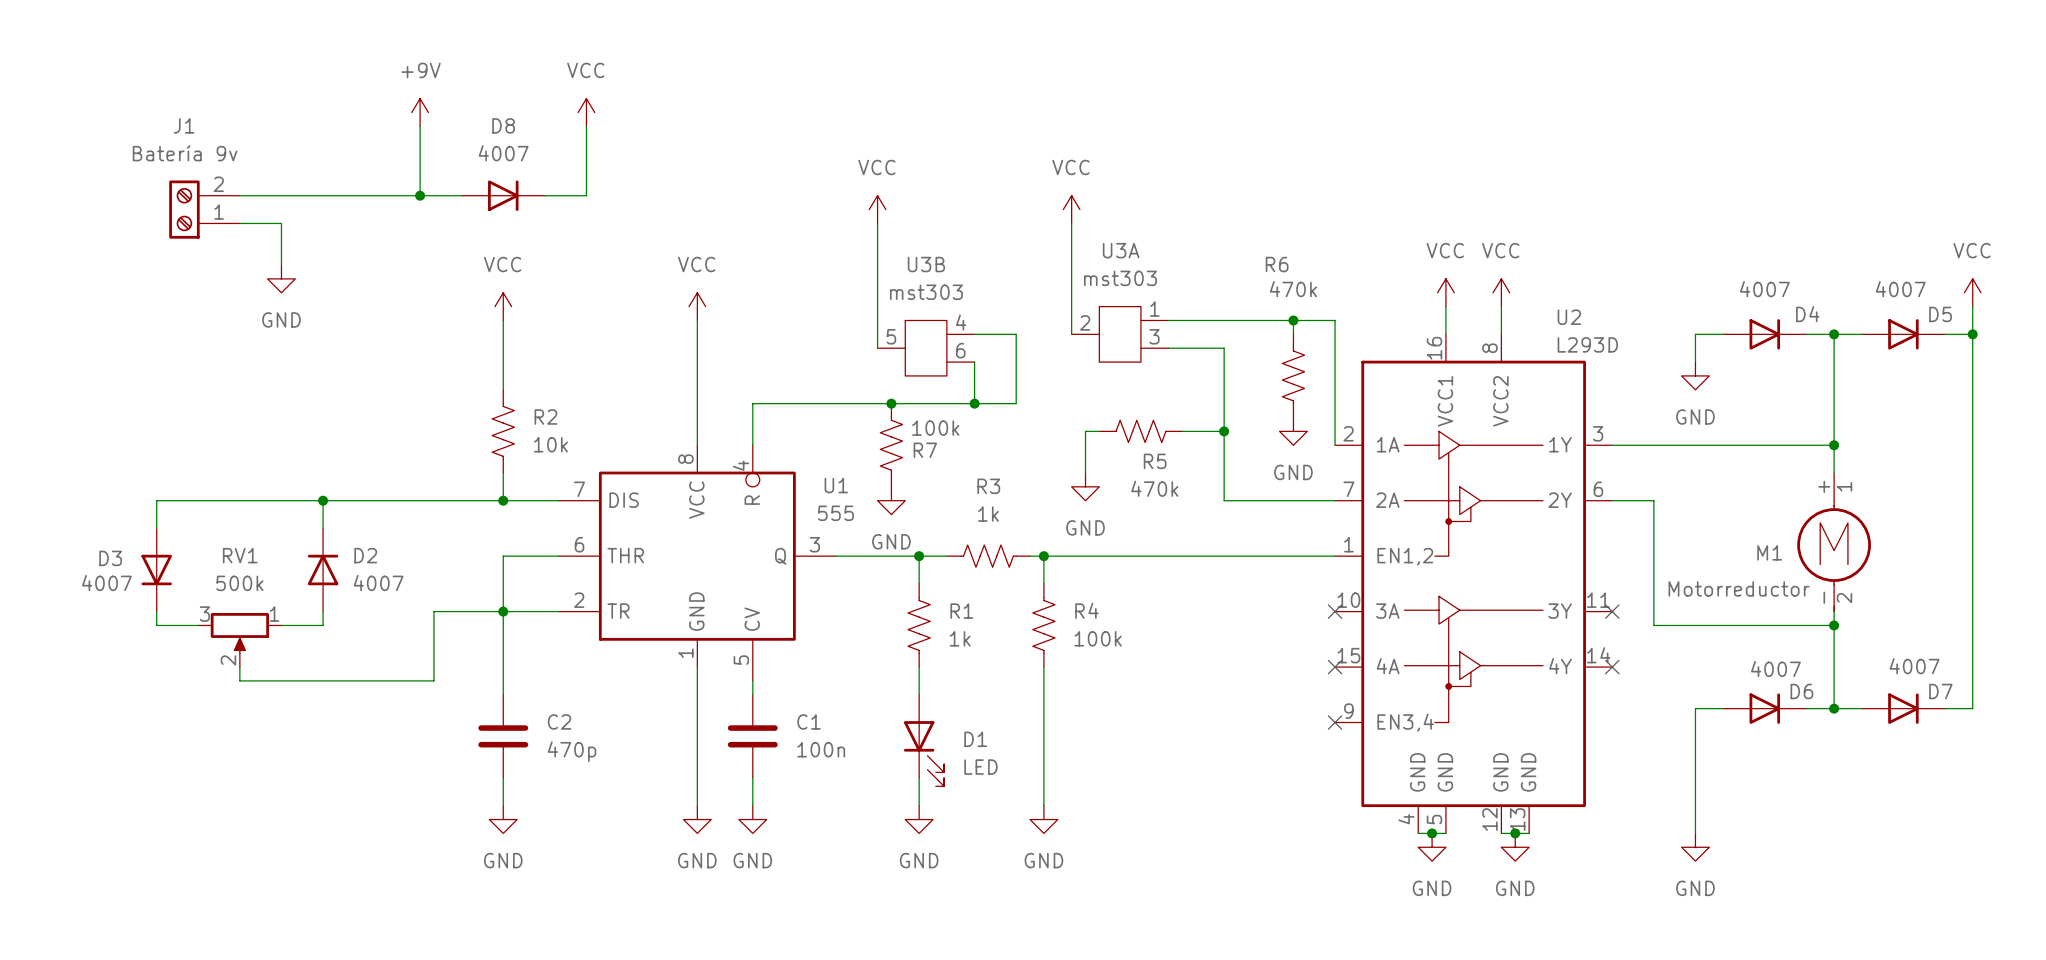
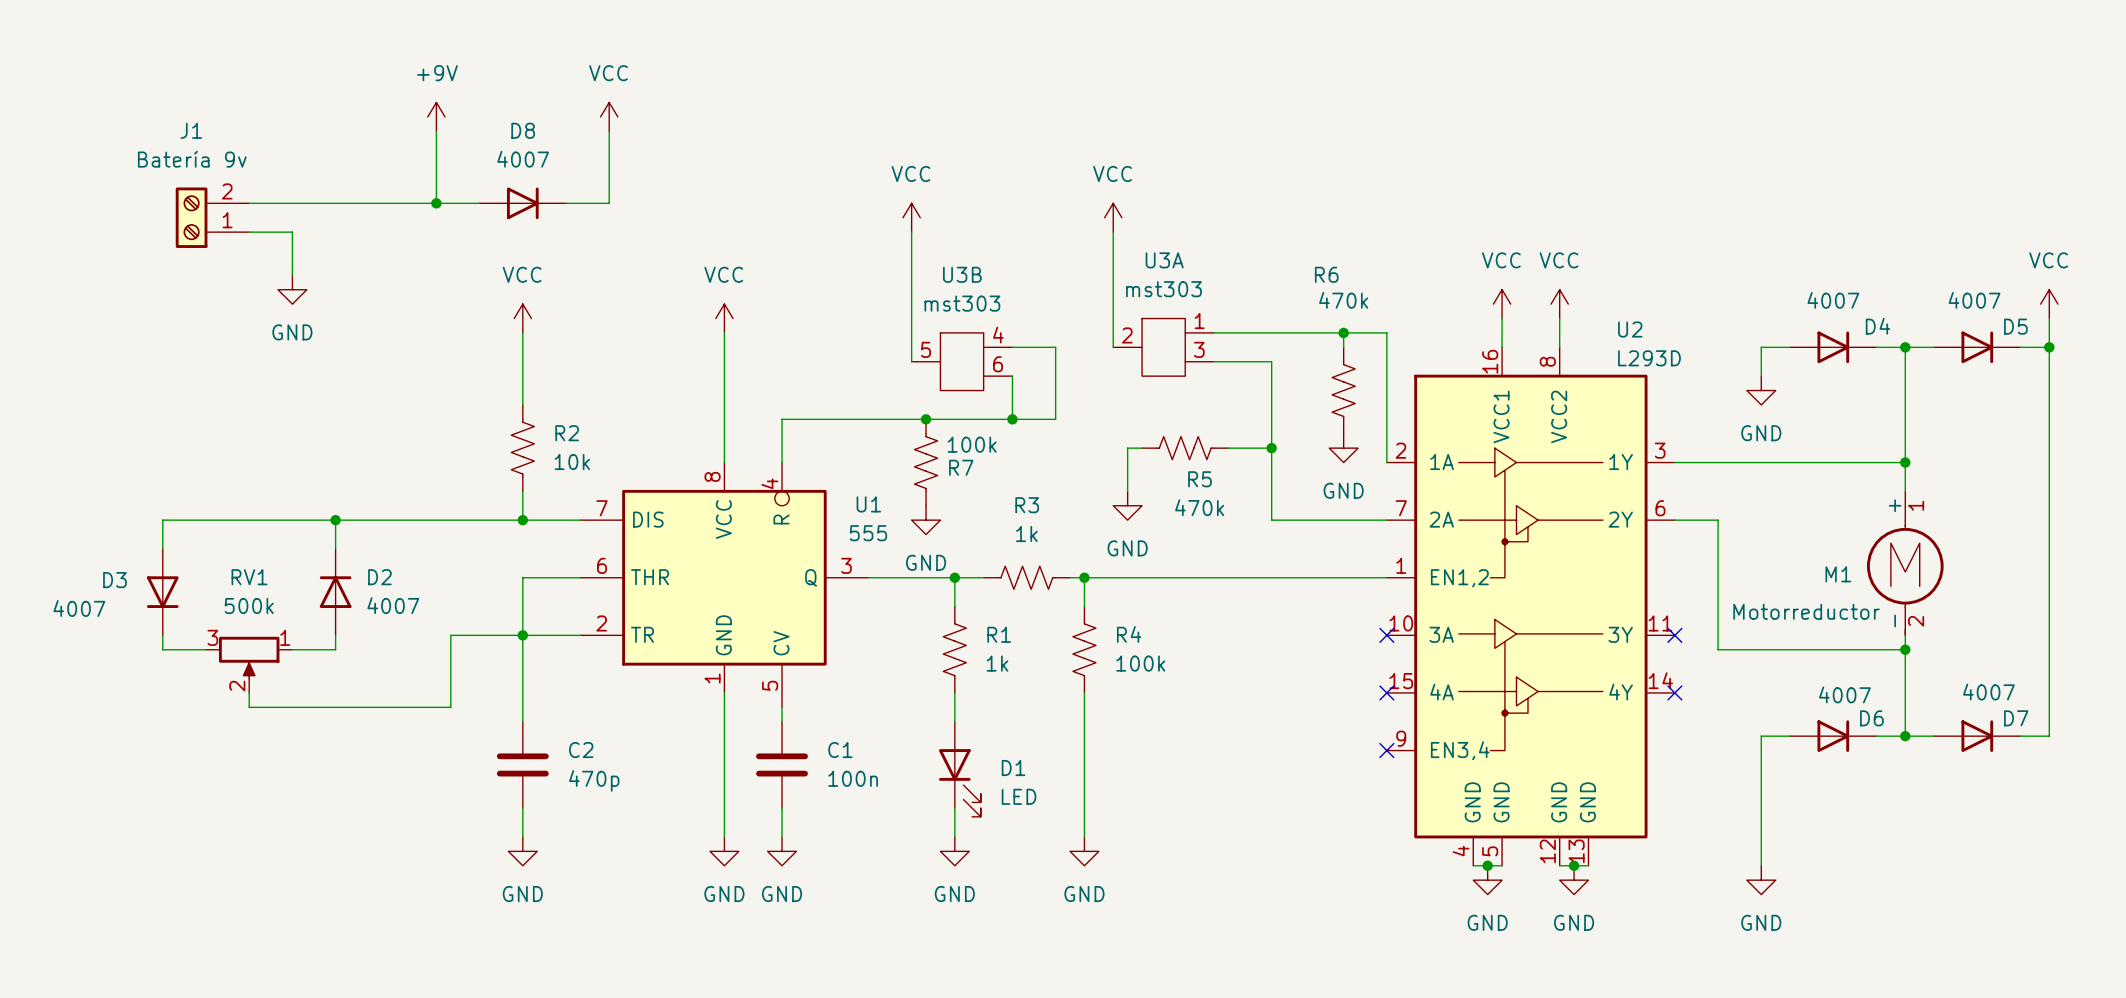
D3 value position: 4007 (106, 583) -> 4007 (79, 608)

